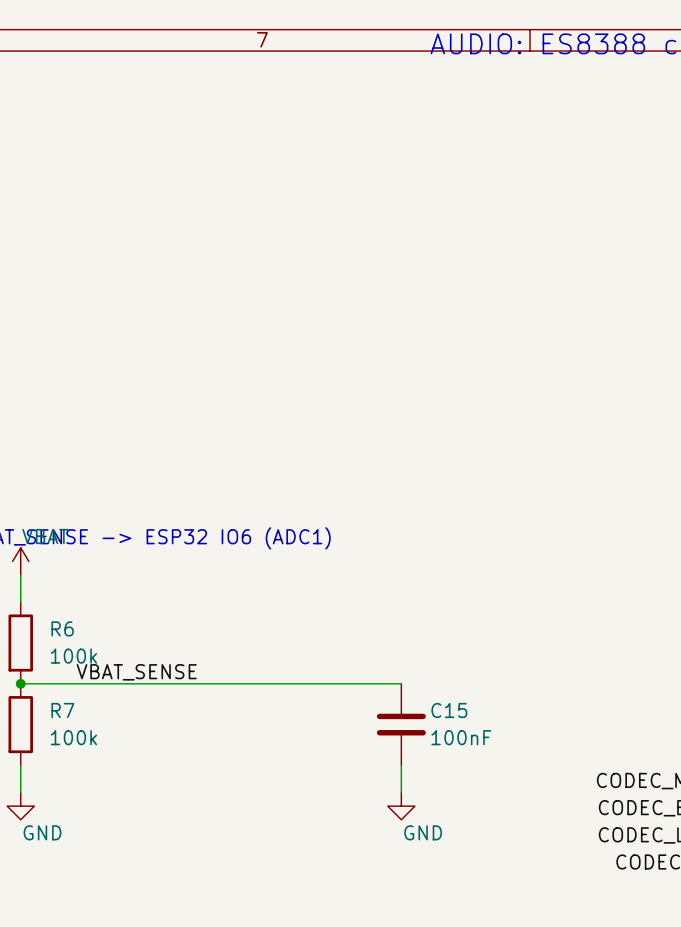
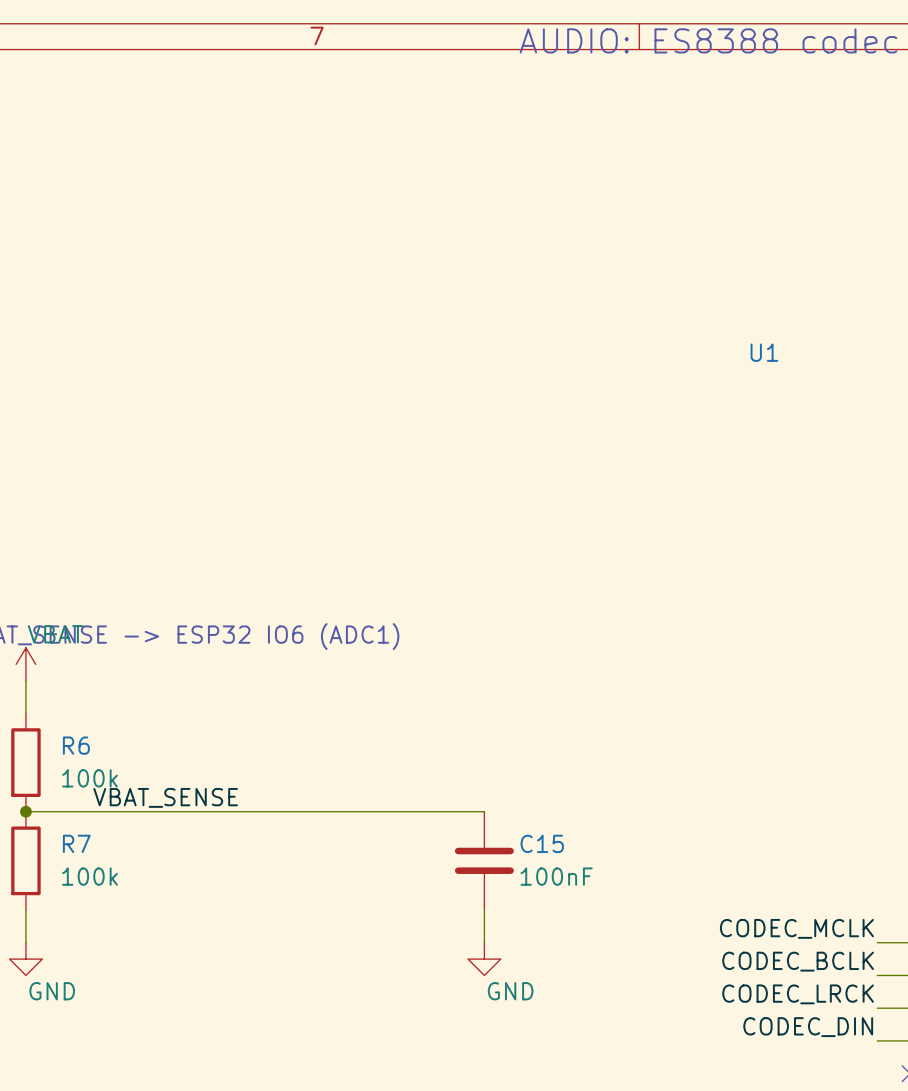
U1 name: none -> U1 (764, 352)

